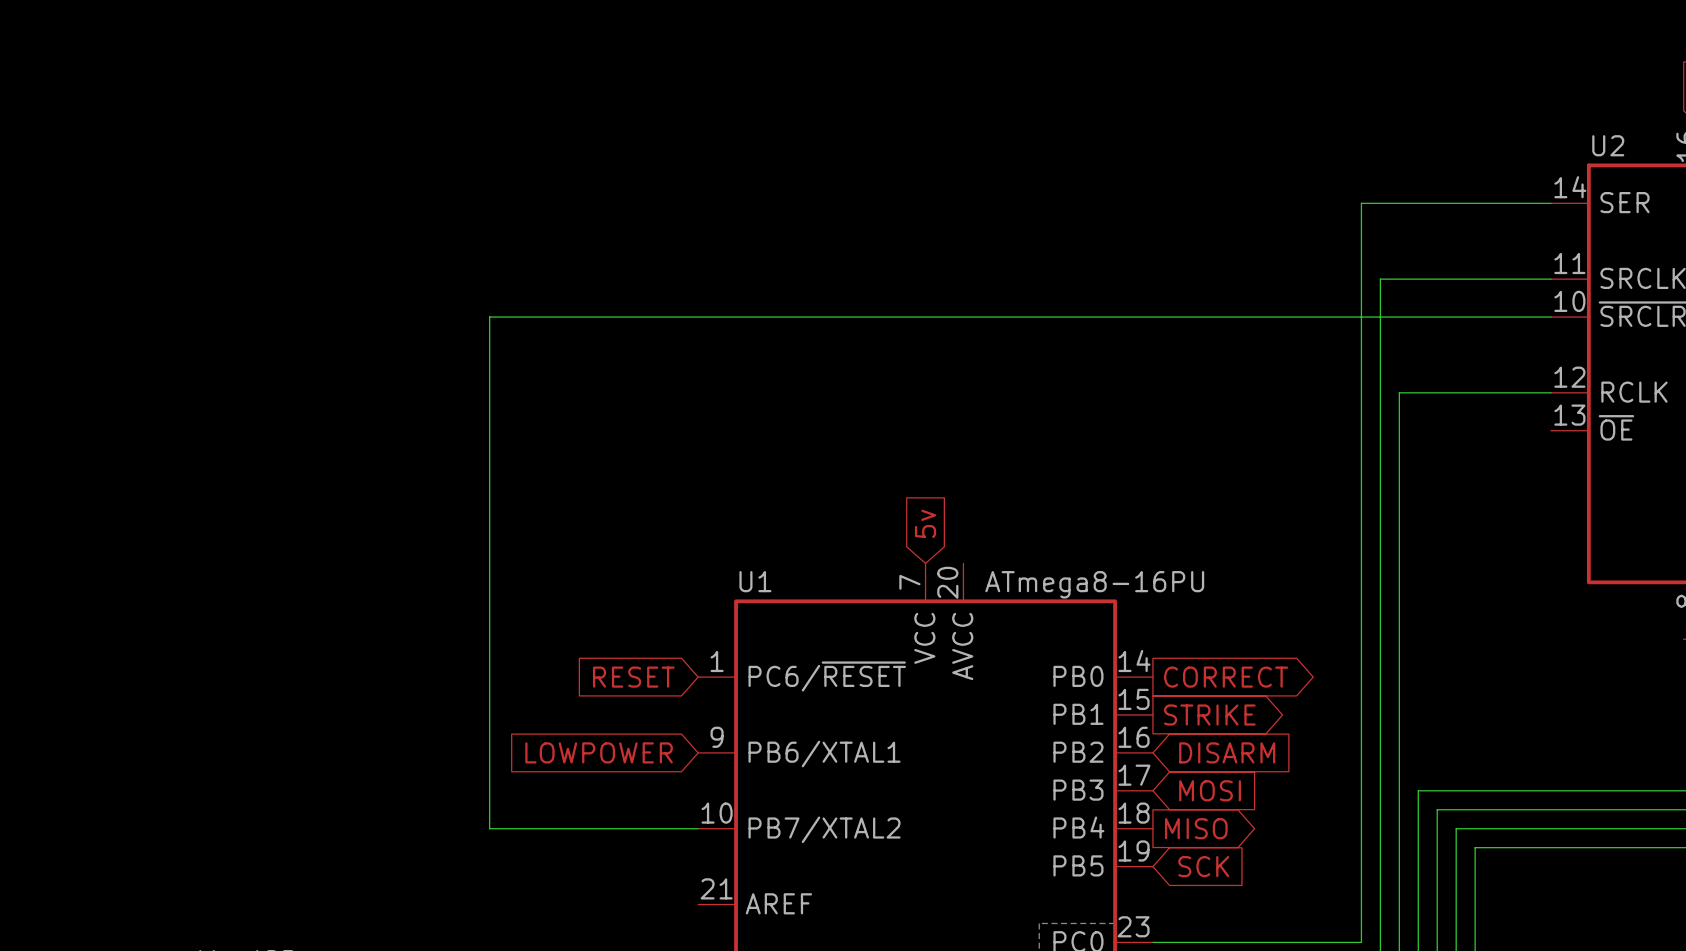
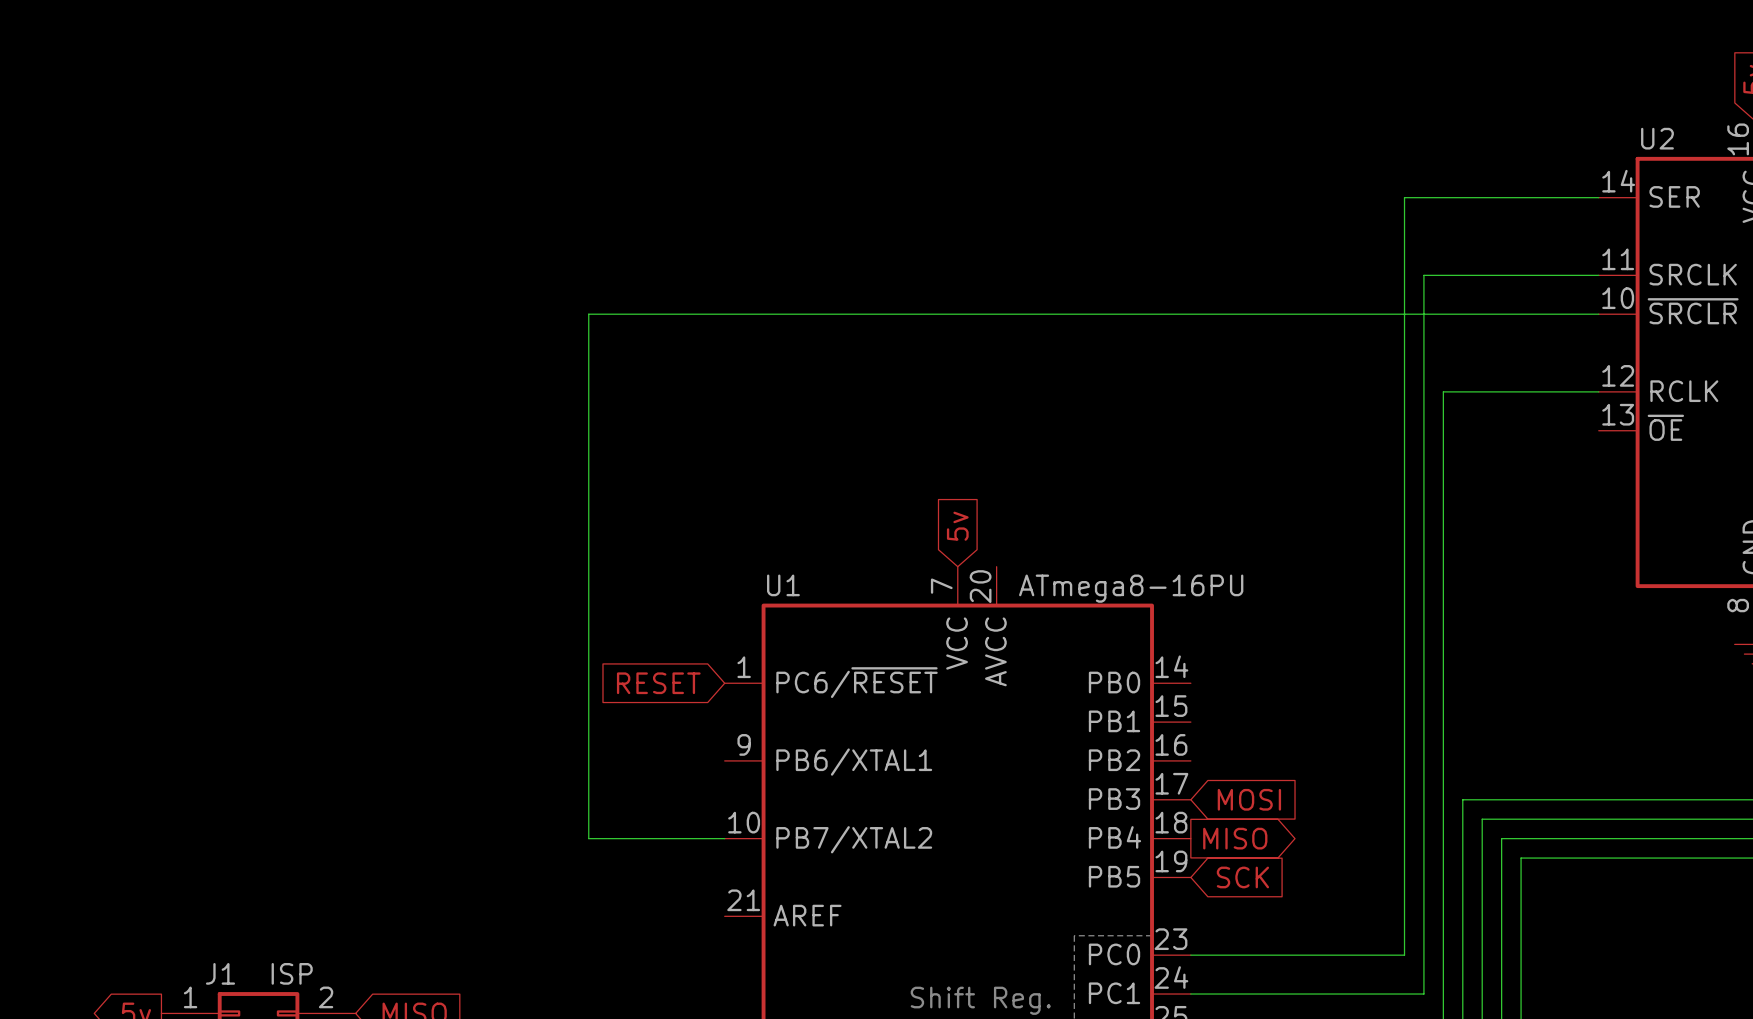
wire: (565, 317) (489, 317) (489, 828) (565, 828) -> (588, 314) (588, 838)
global label: CORRECT (1226, 677) -> none
global label: STRIKE (1209, 715) -> none
global label: LOWPOWER (599, 752) -> none
global label: DISARM (1227, 752) -> none

